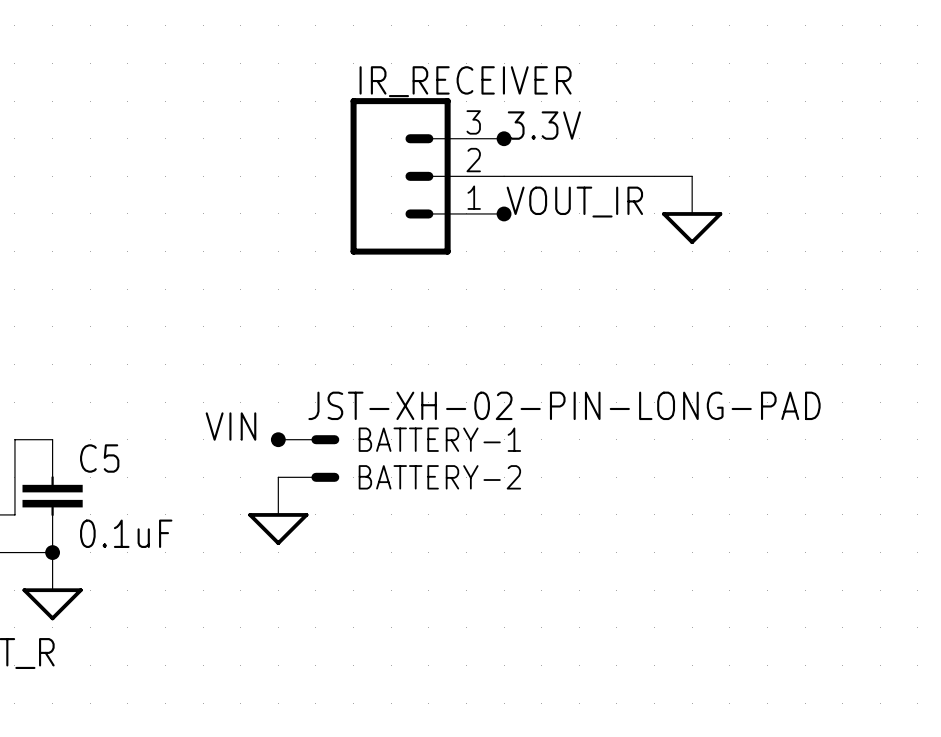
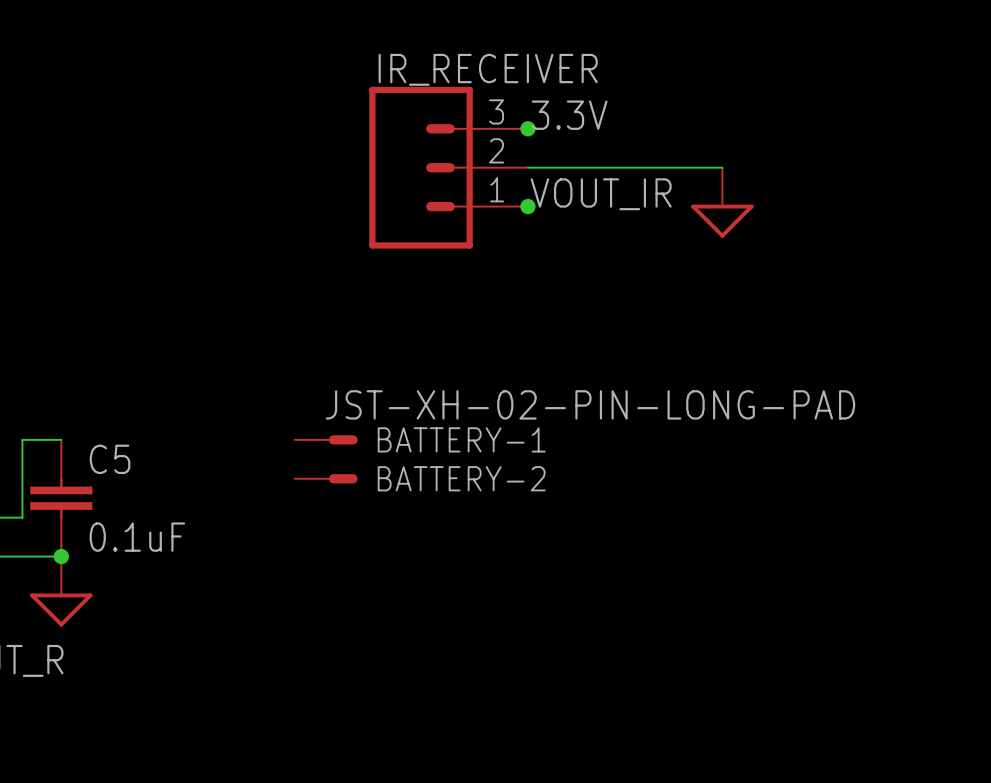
label: VIN (230, 426) -> none
junction: (278, 439) -> none
power symbol: (278, 511) -> none

